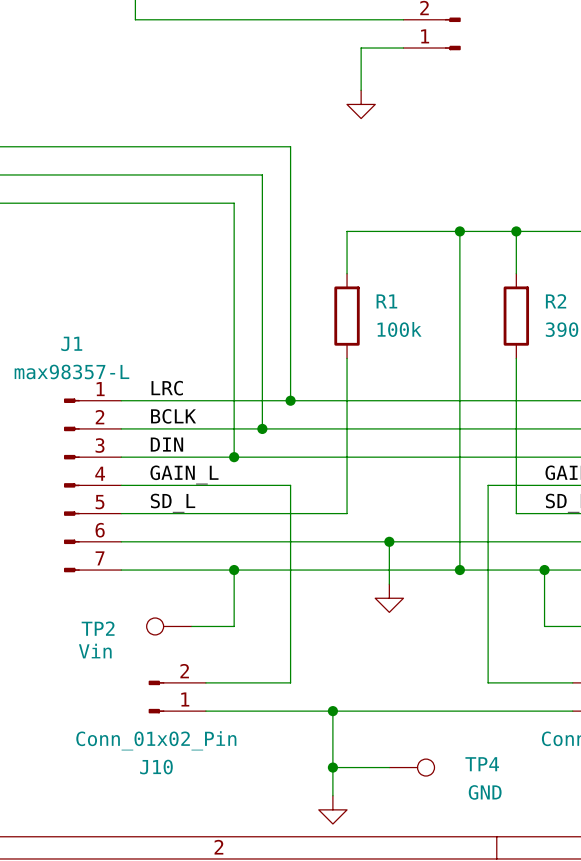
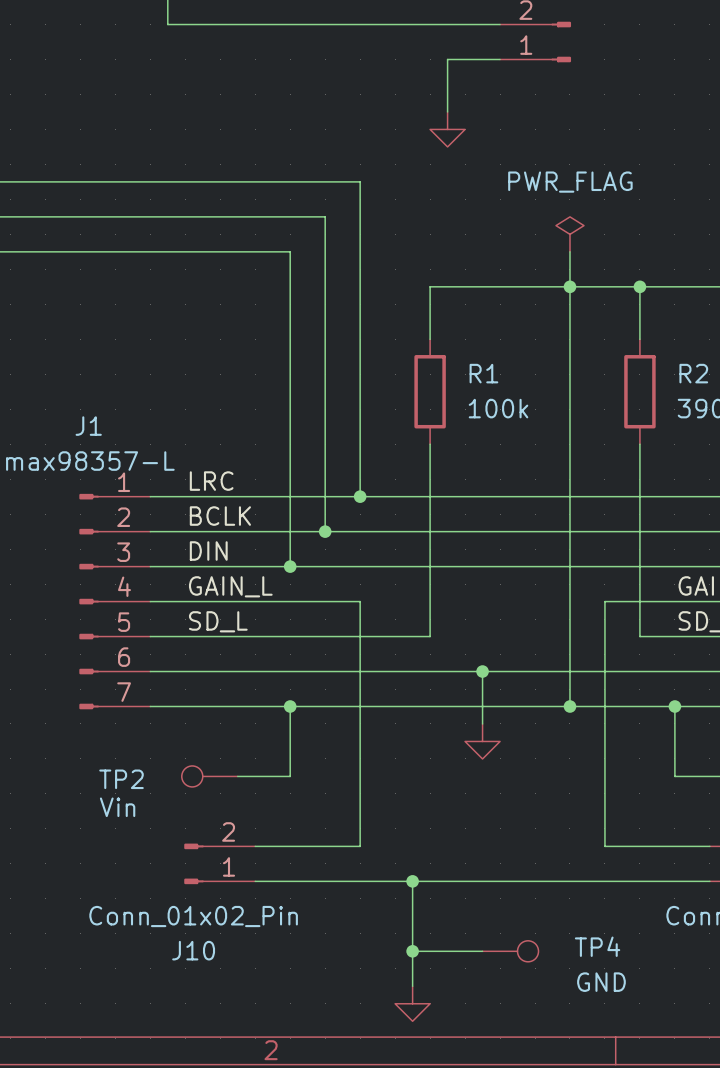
power symbol: none -> PWR_FLAG (569, 234)
wire: none -> (569, 251) (569, 286)

